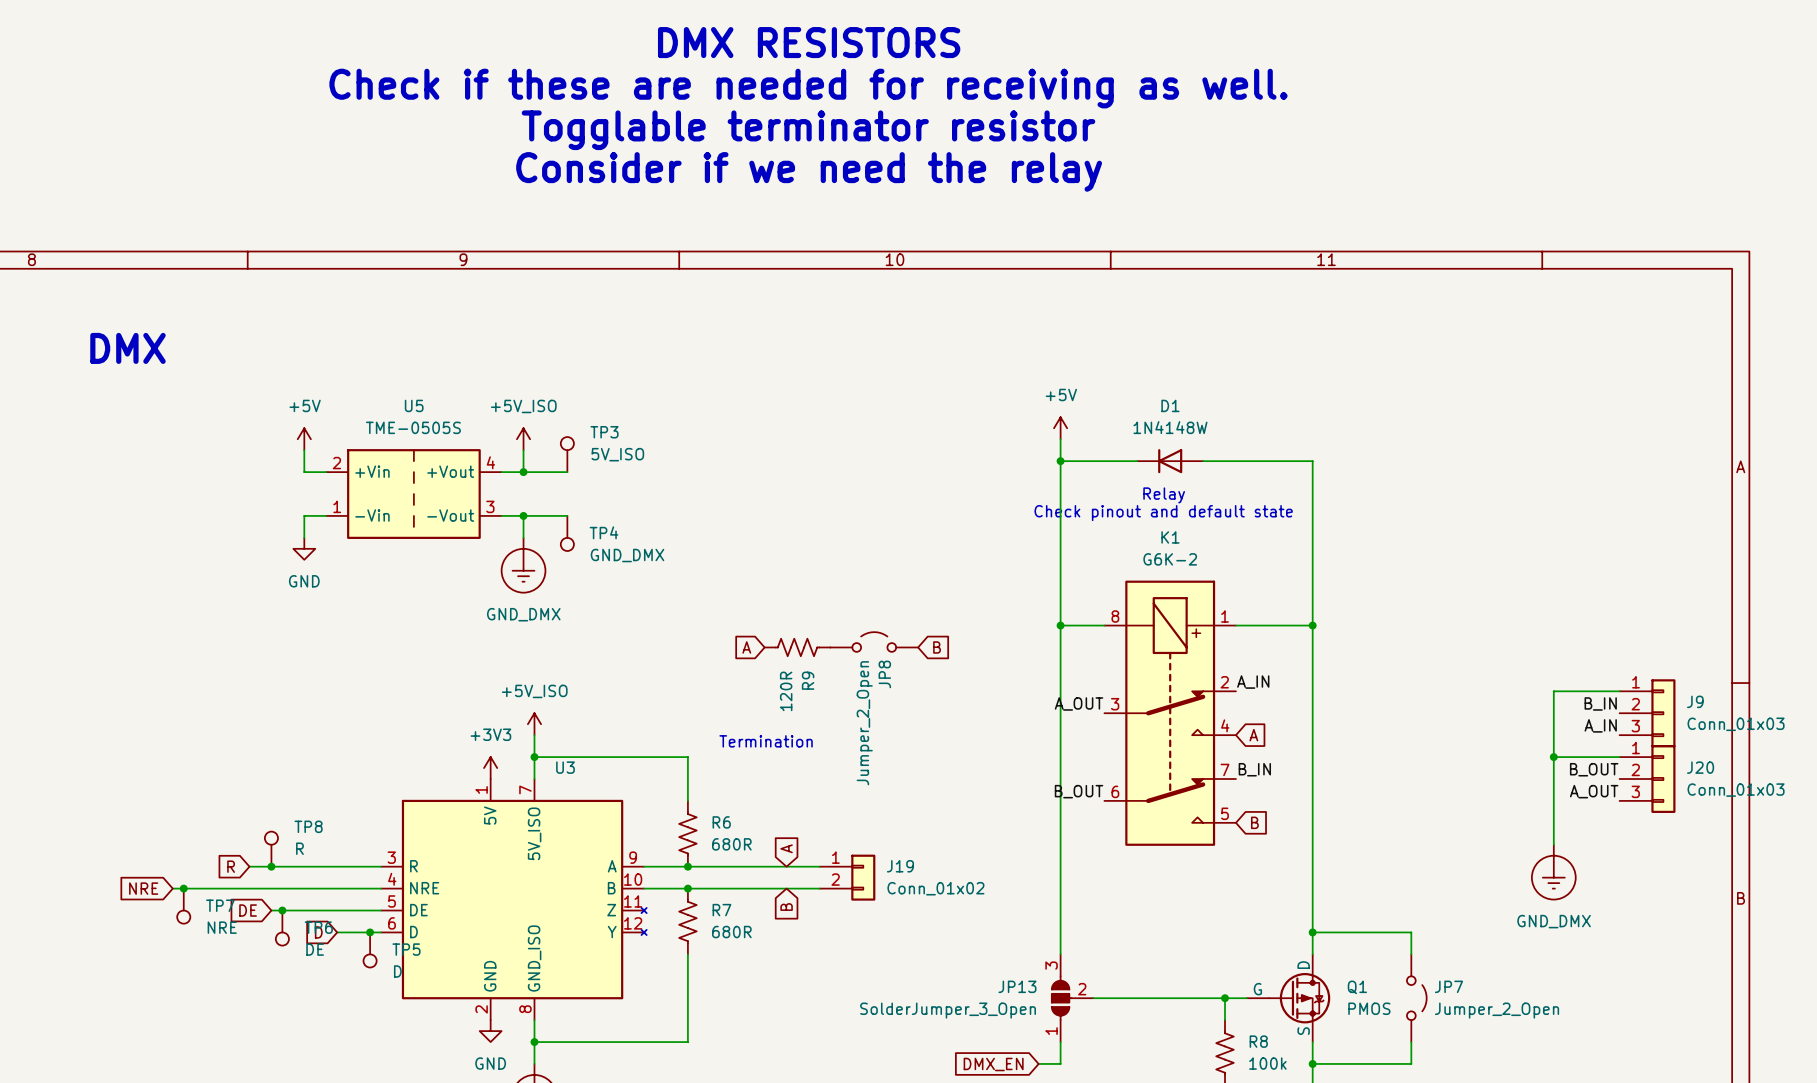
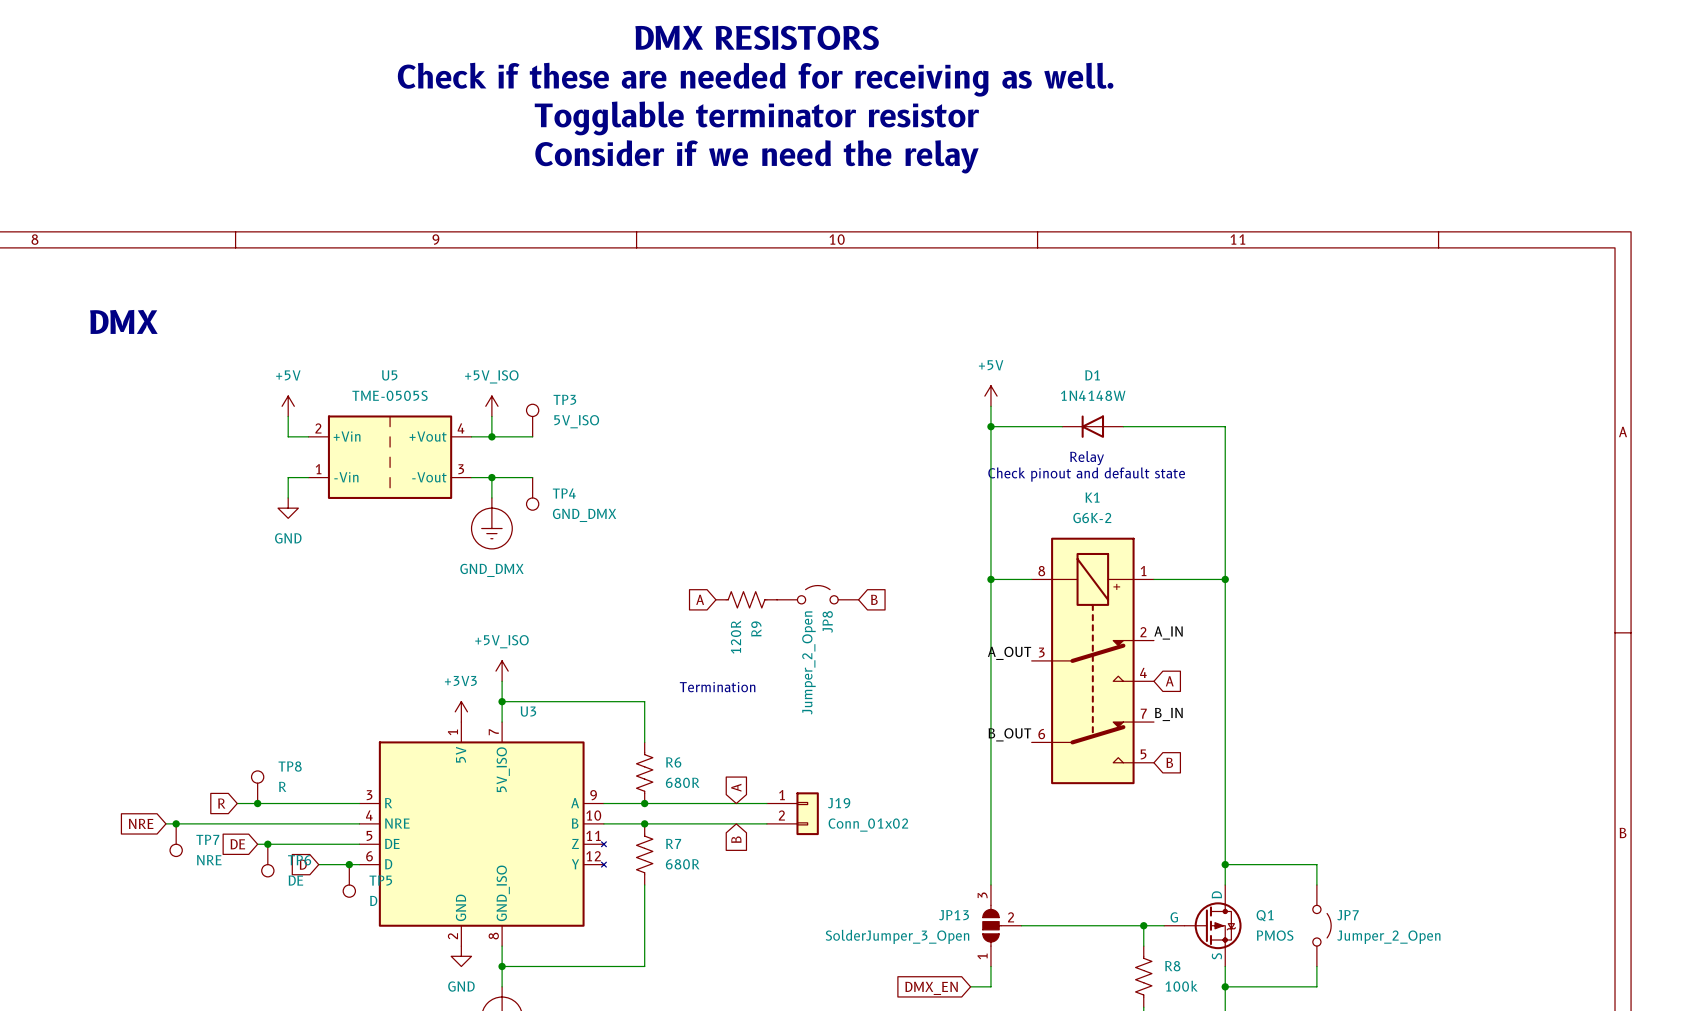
wire: (1619, 691) (1553, 691) (1553, 844) -> none
label: B_IN (1600, 703) -> none
J9: Conn_01x03 (1647, 713) -> none
label: A_IN (1600, 725) -> none
wire: (1553, 757) (1619, 757) -> none
junction: (1553, 757) -> none
label: B_OUT (1594, 769) -> none
J20: Conn_01x03 (1647, 779) -> none
label: A_OUT (1594, 791) -> none
power symbol: GND_DMX (1553, 872) -> none

